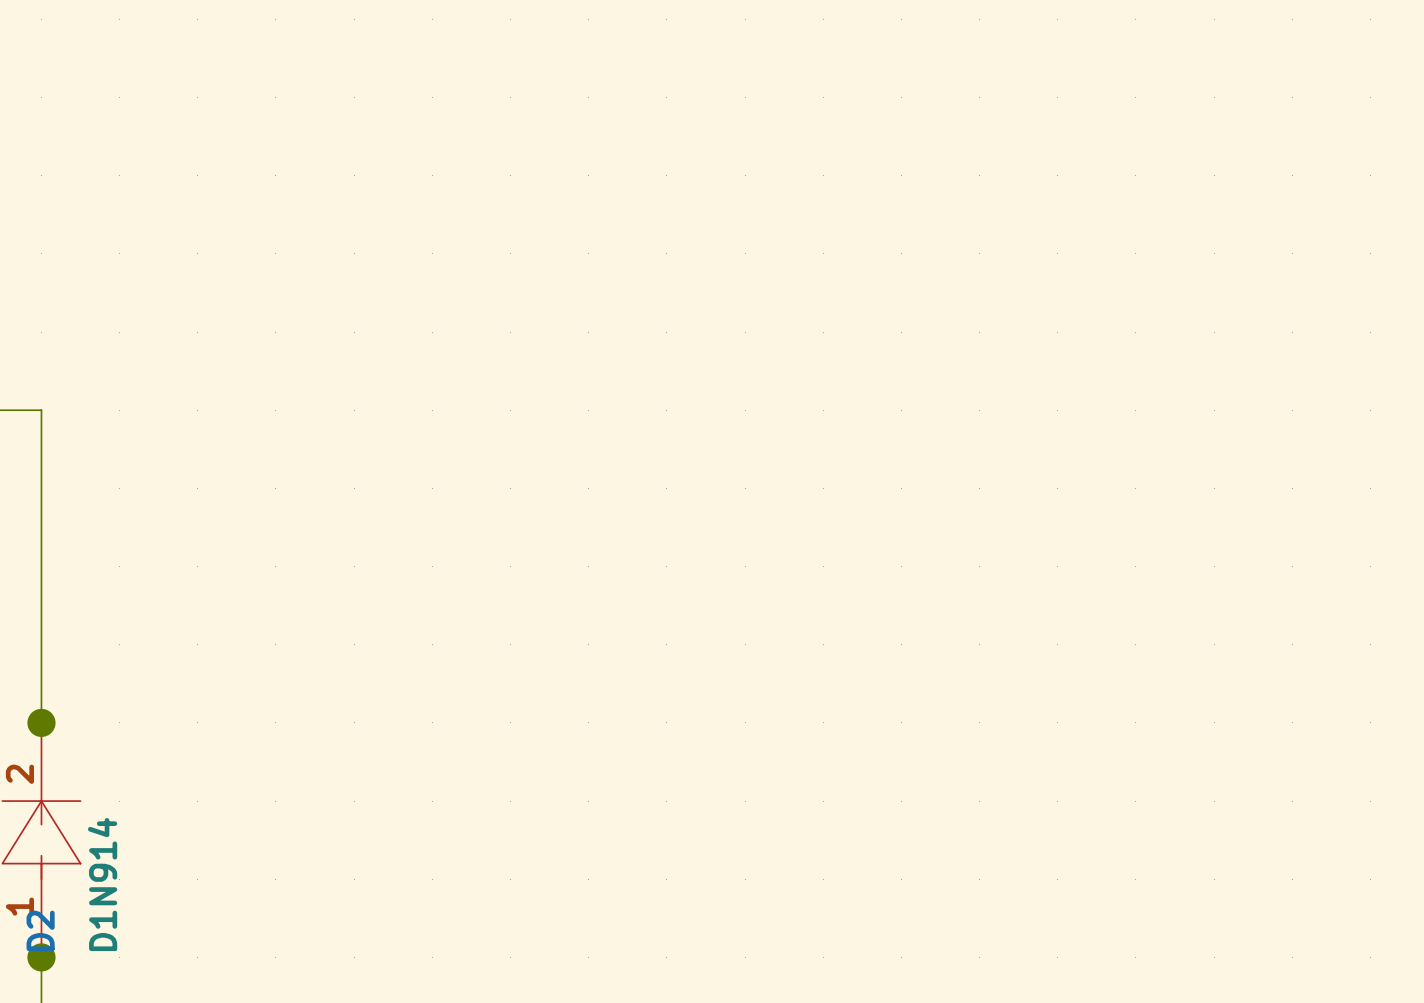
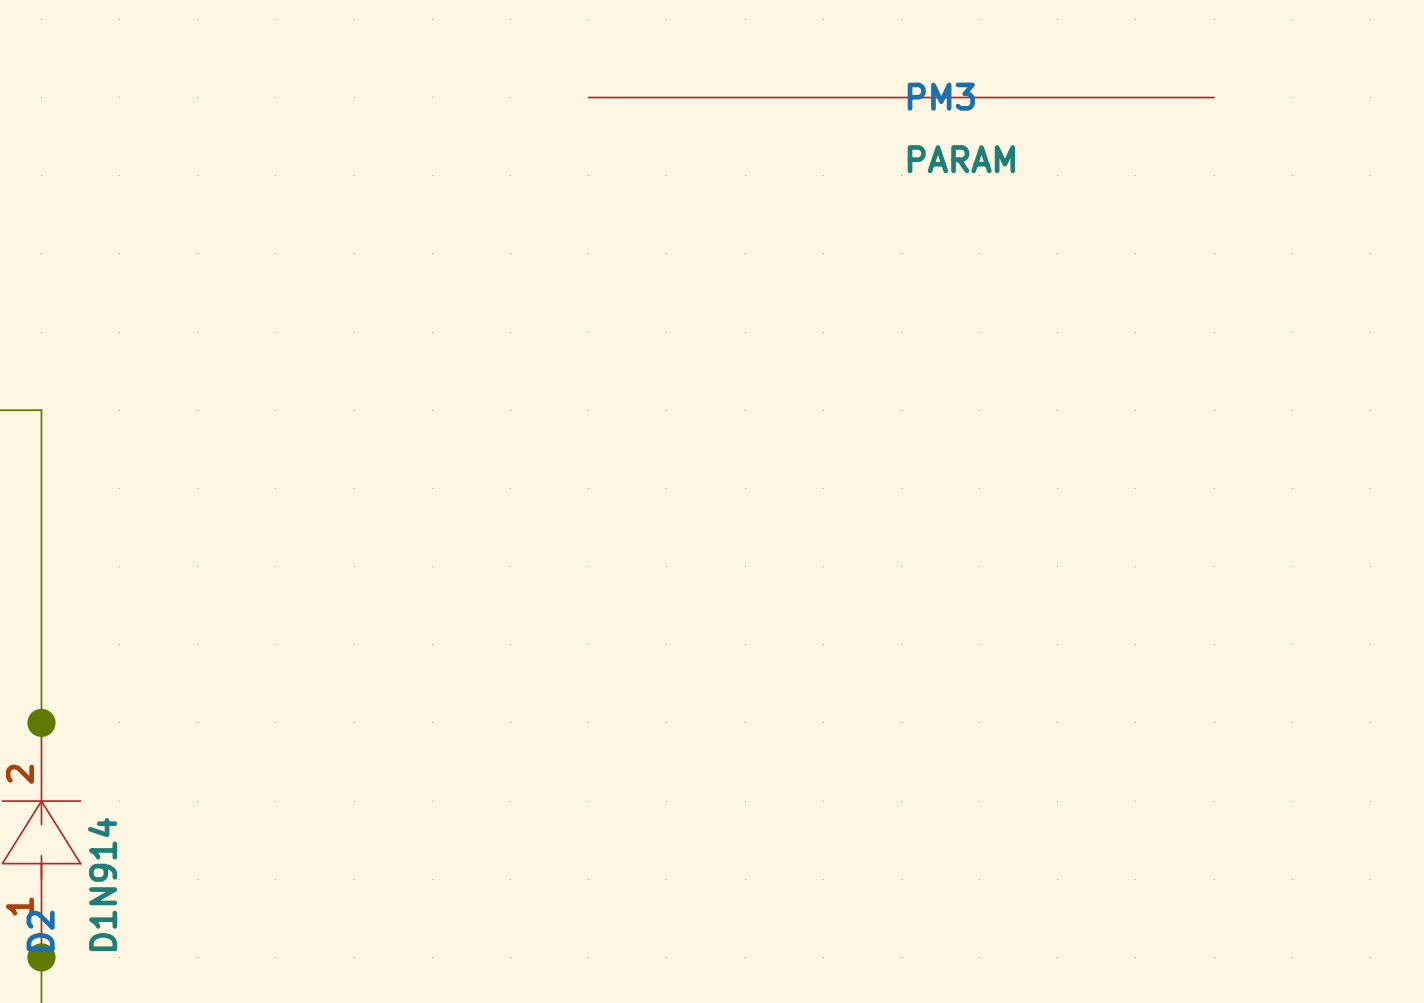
PM3: none -> PARAM (901, 97)

